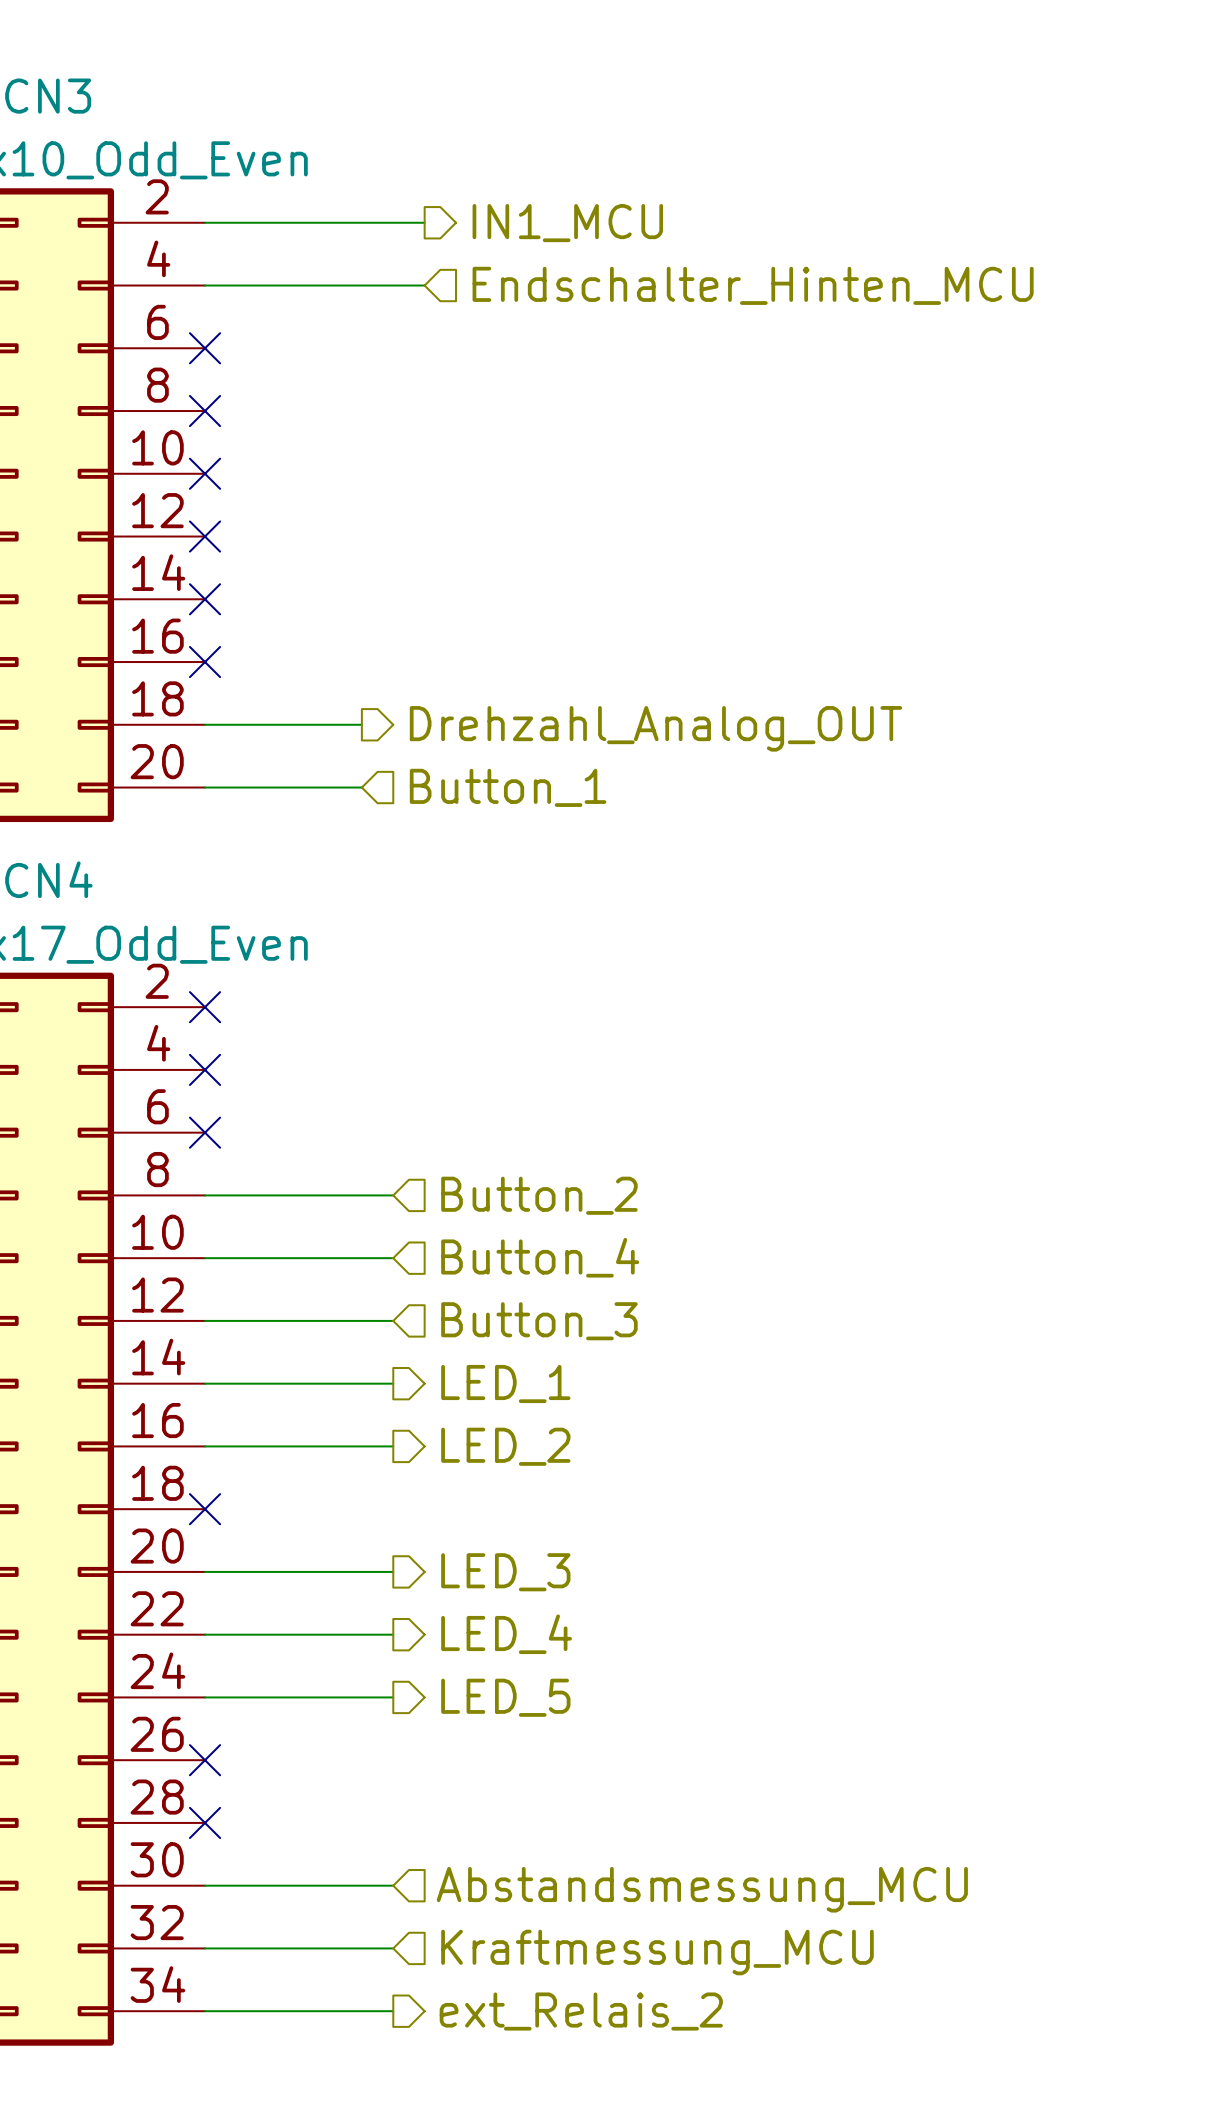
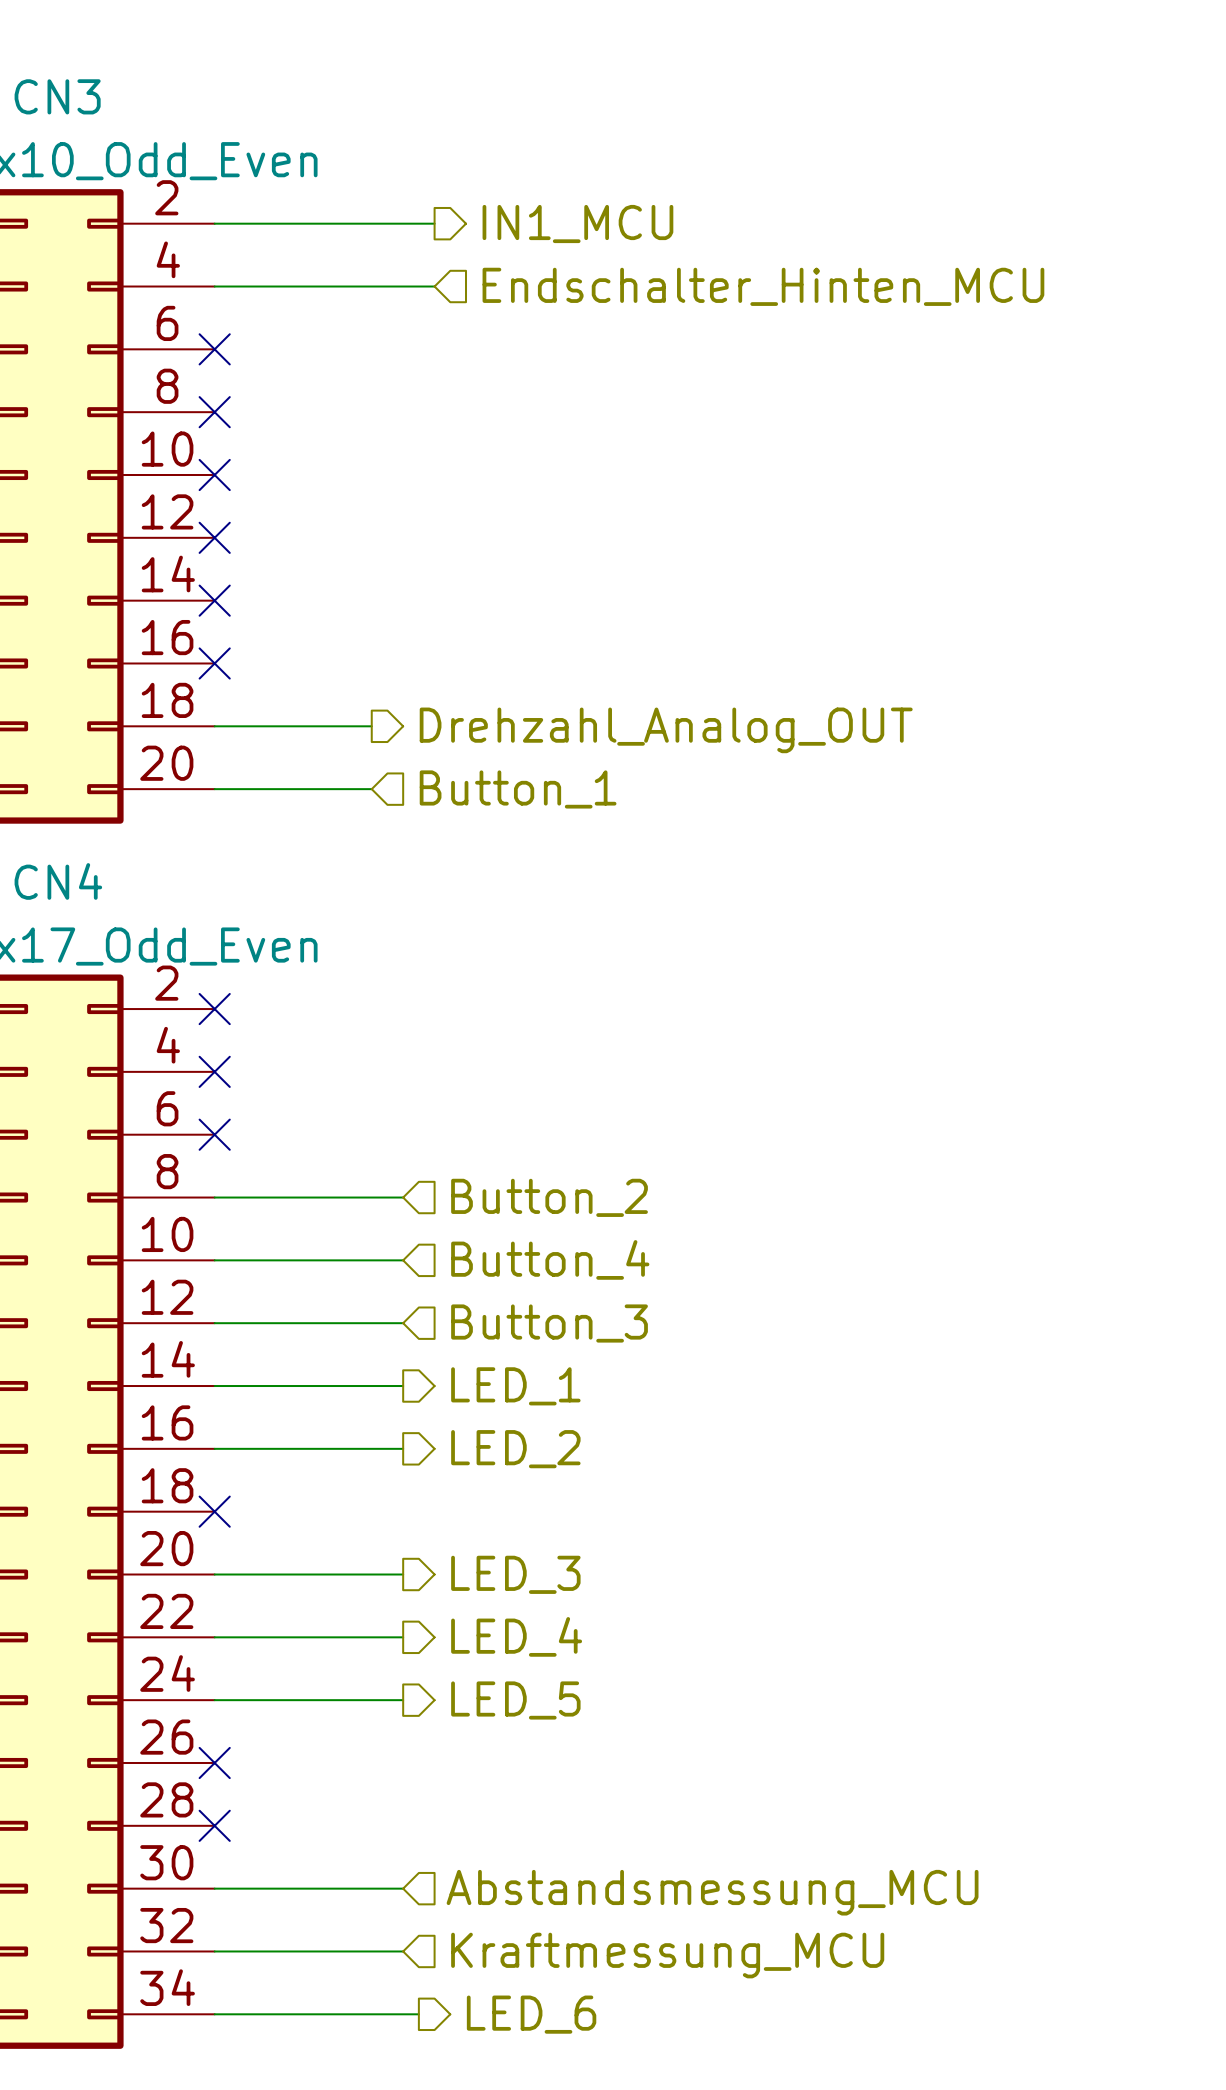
wire: none -> (403, 2014) (418, 2014)
hierarchical label: ext_Relais_2 (581, 2011) -> LED_6 (531, 2014)

